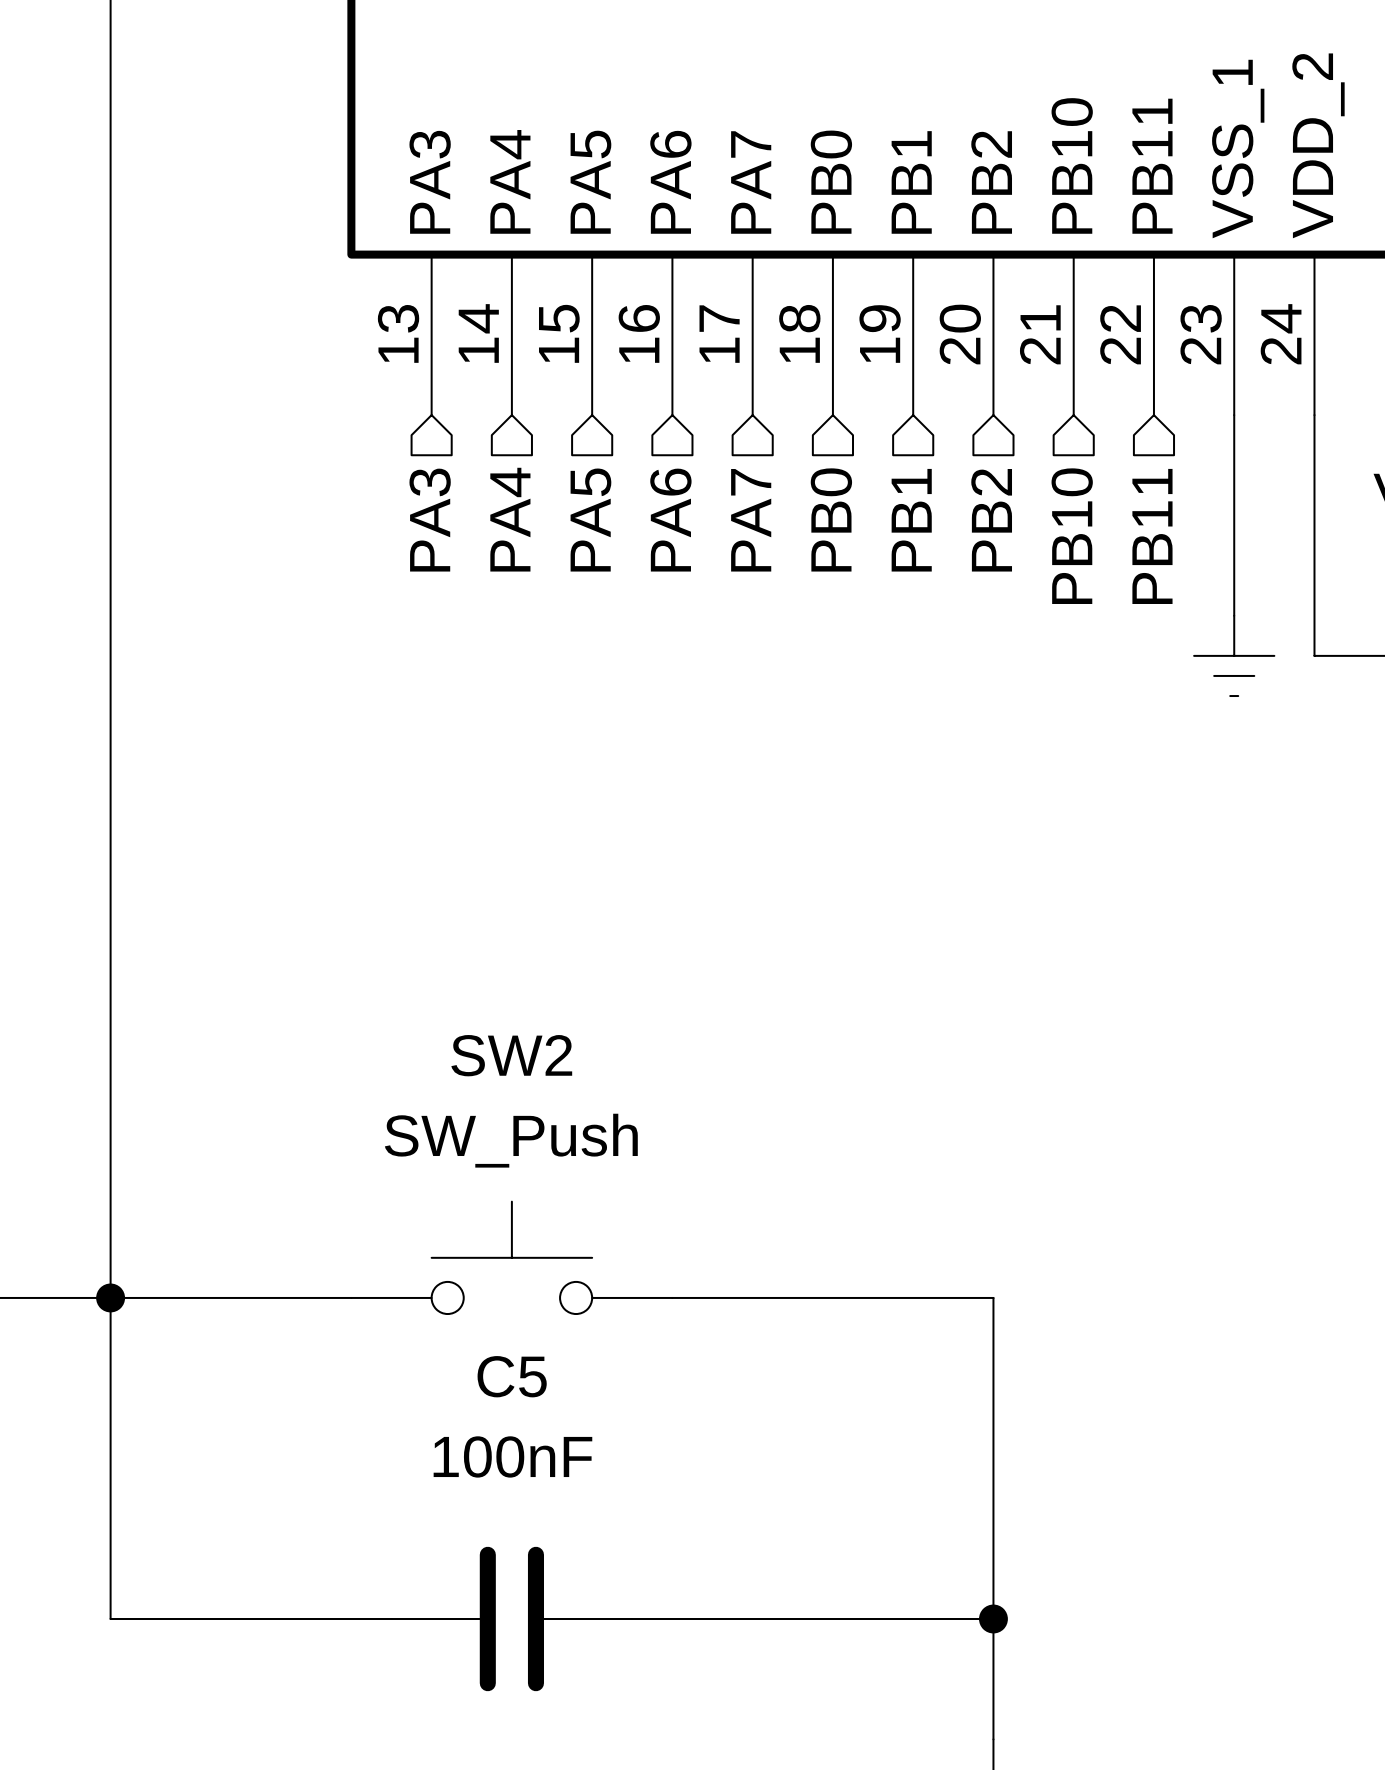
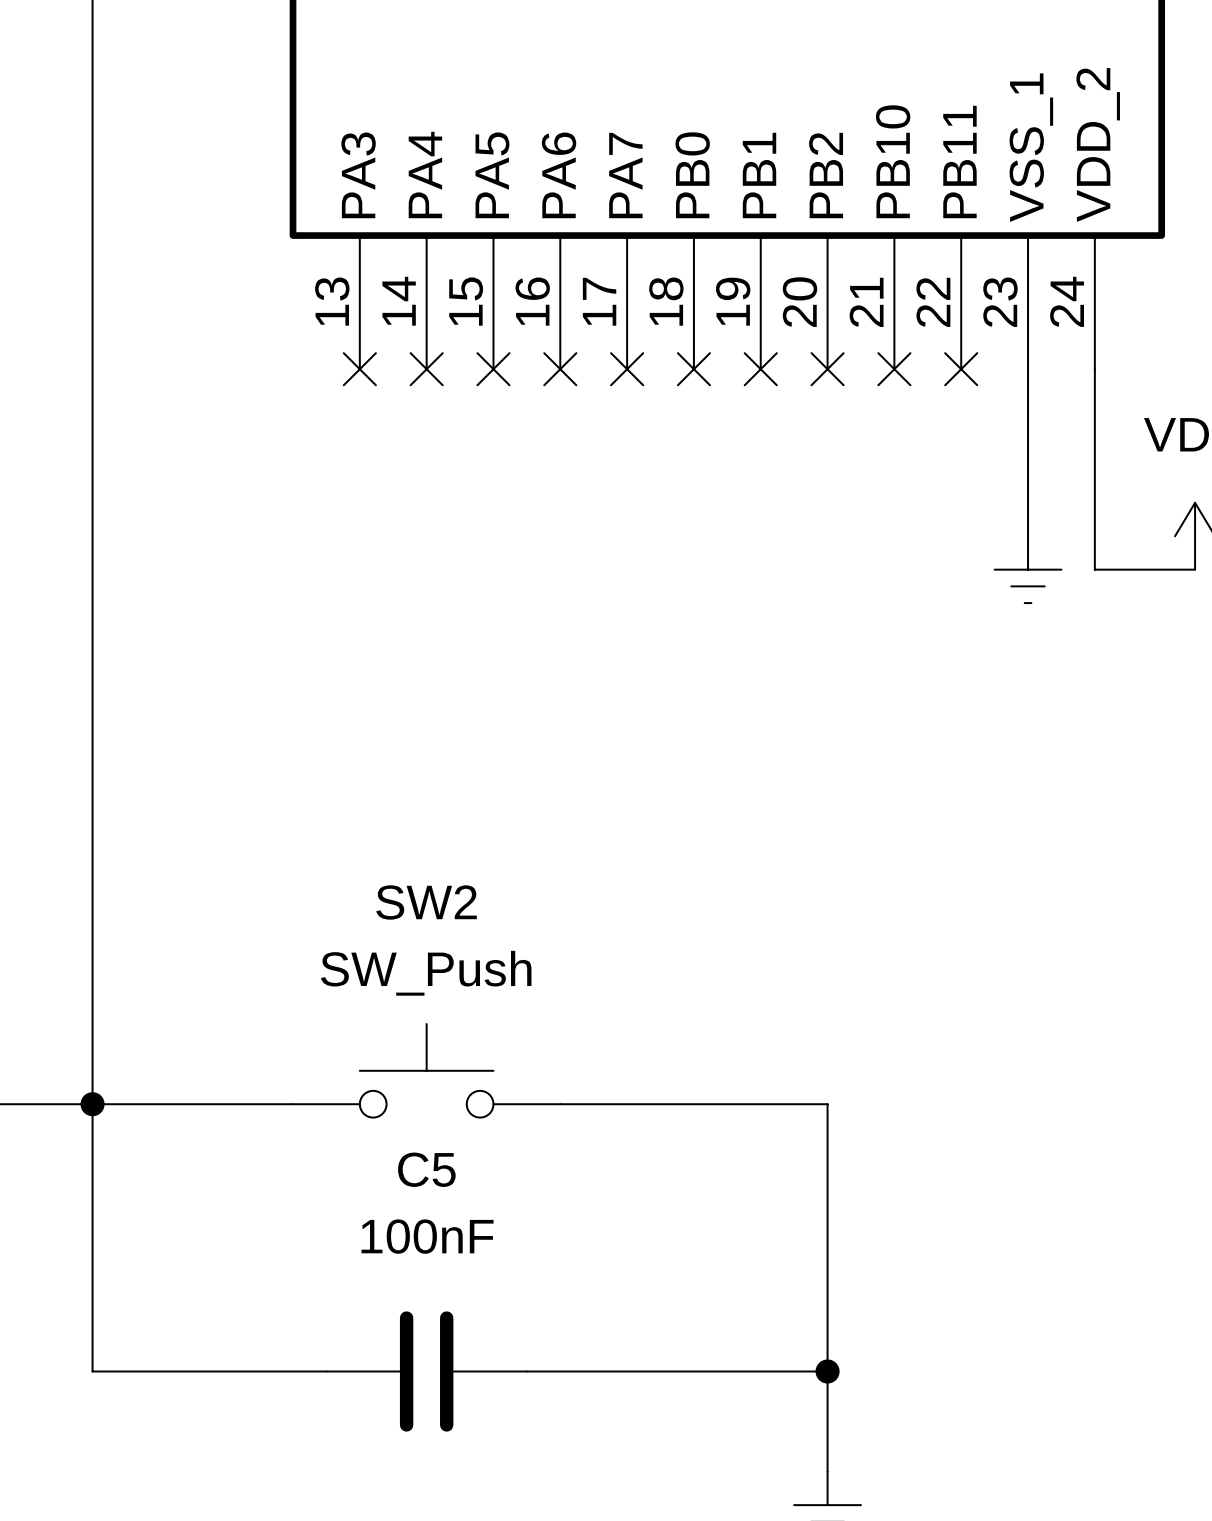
no-connect mark: none -> (359, 369)
no-connect mark: none -> (426, 369)
no-connect mark: none -> (493, 369)
no-connect mark: none -> (560, 369)
no-connect mark: none -> (627, 369)
no-connect mark: none -> (693, 369)
no-connect mark: none -> (760, 369)
no-connect mark: none -> (827, 369)
no-connect mark: none -> (894, 369)
no-connect mark: none -> (961, 369)
hierarchical label: PA4 (510, 519) -> none
hierarchical label: PB0 (831, 519) -> none
hierarchical label: PA3 (430, 520) -> none
hierarchical label: PA5 (590, 520) -> none
hierarchical label: PA6 (670, 520) -> none
hierarchical label: PA7 (751, 520) -> none
hierarchical label: PB1 (911, 520) -> none
hierarchical label: PB2 (991, 520) -> none
hierarchical label: PB10 (1072, 536) -> none
hierarchical label: PB11 (1152, 536) -> none

